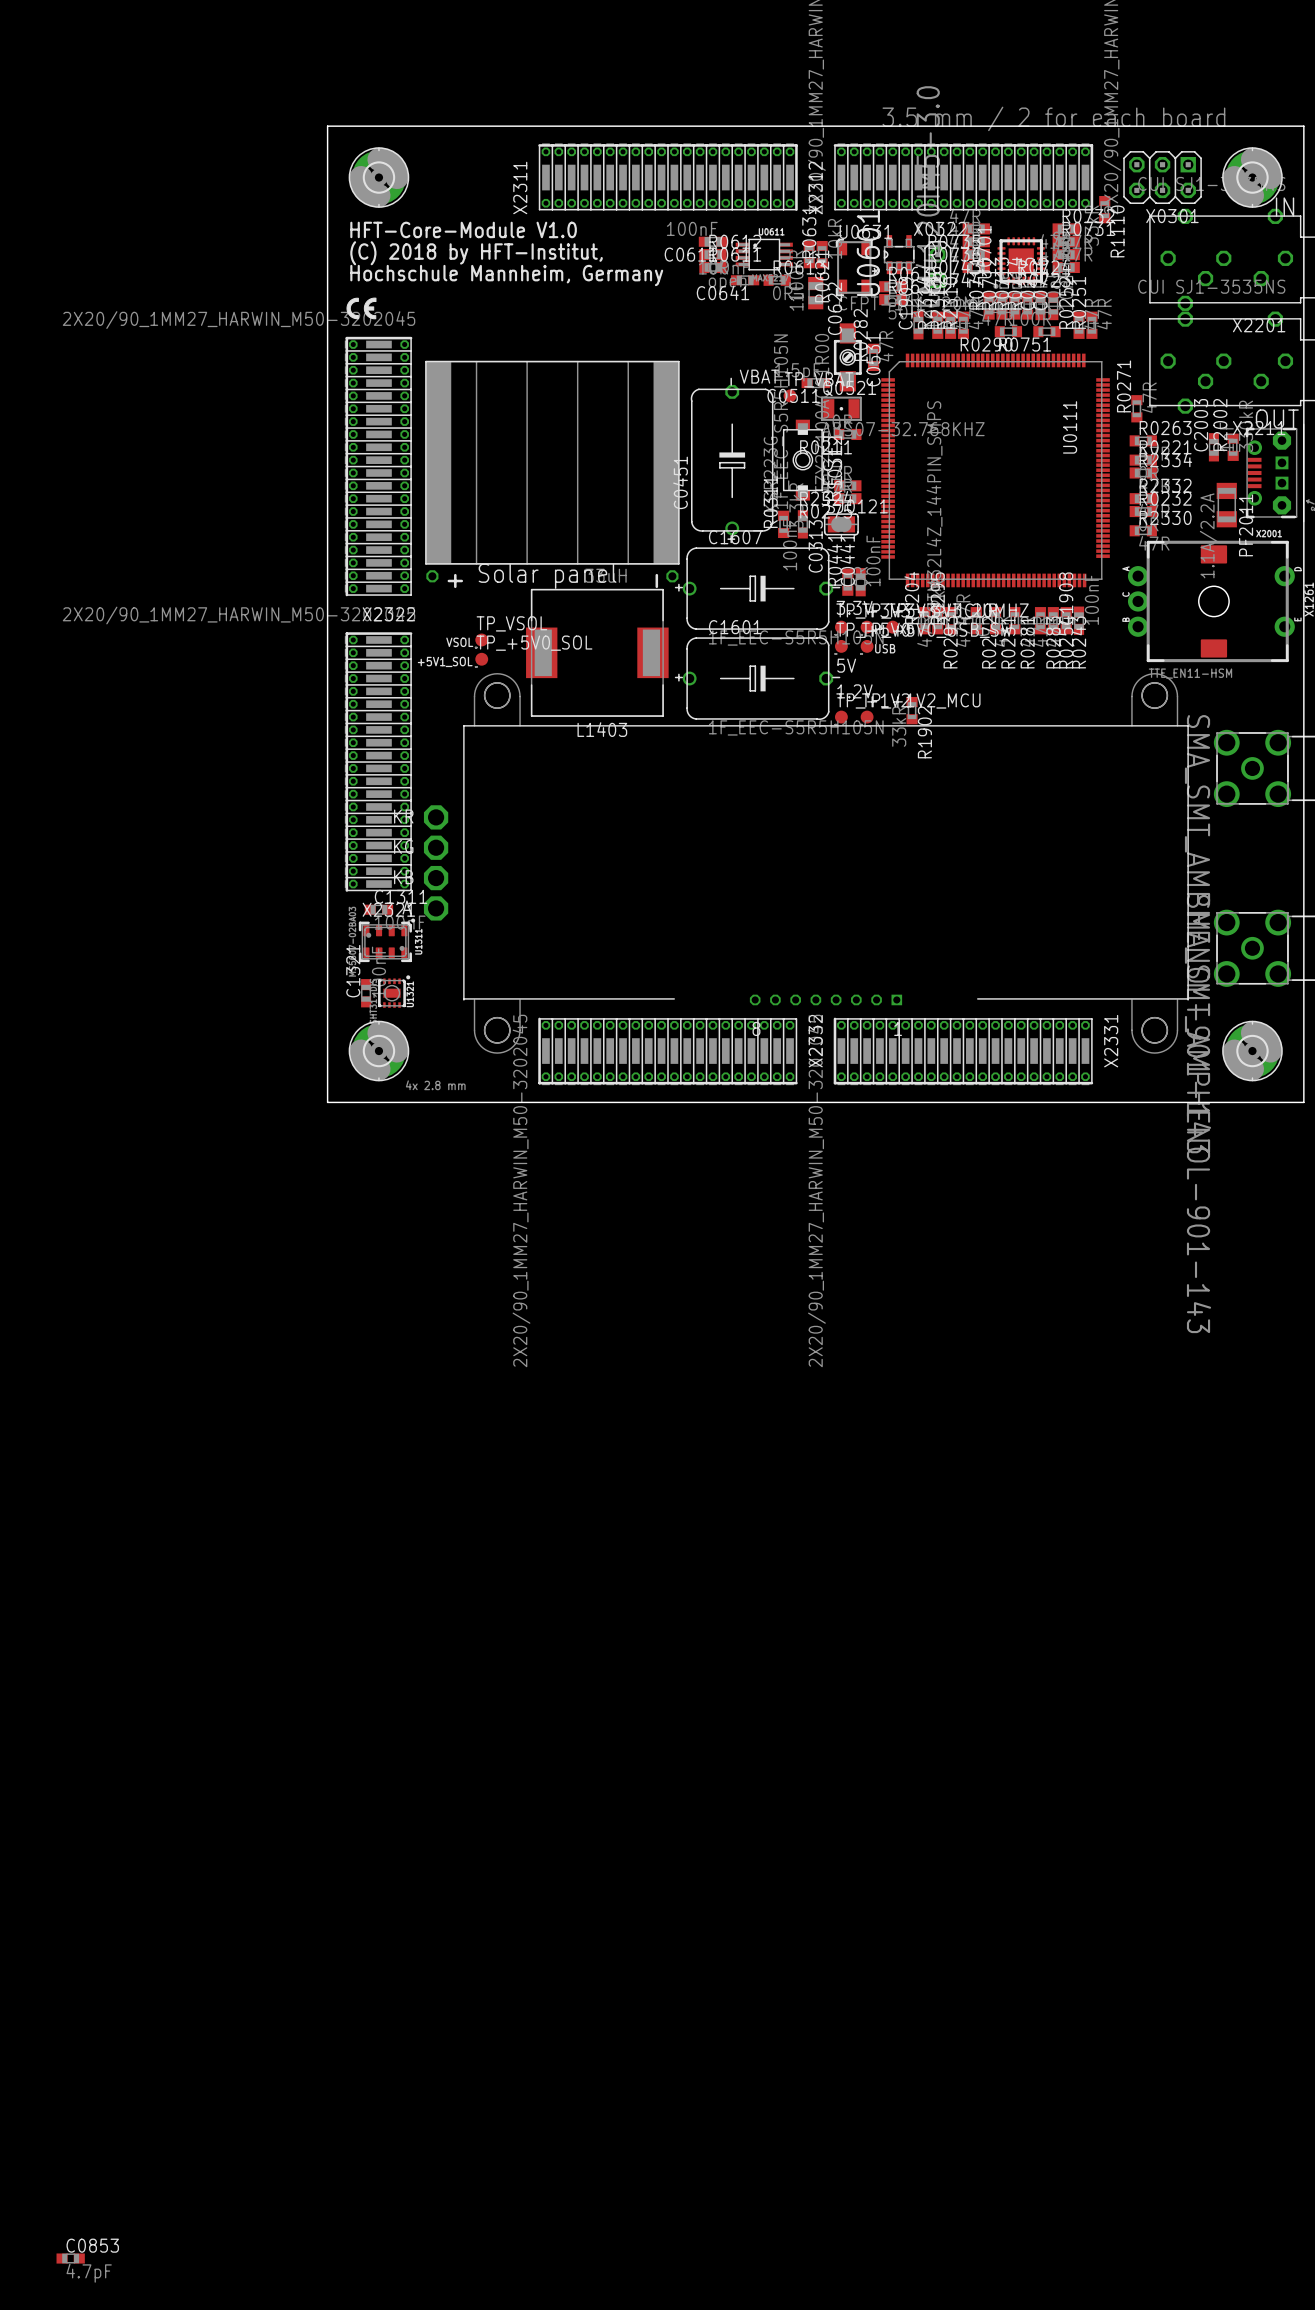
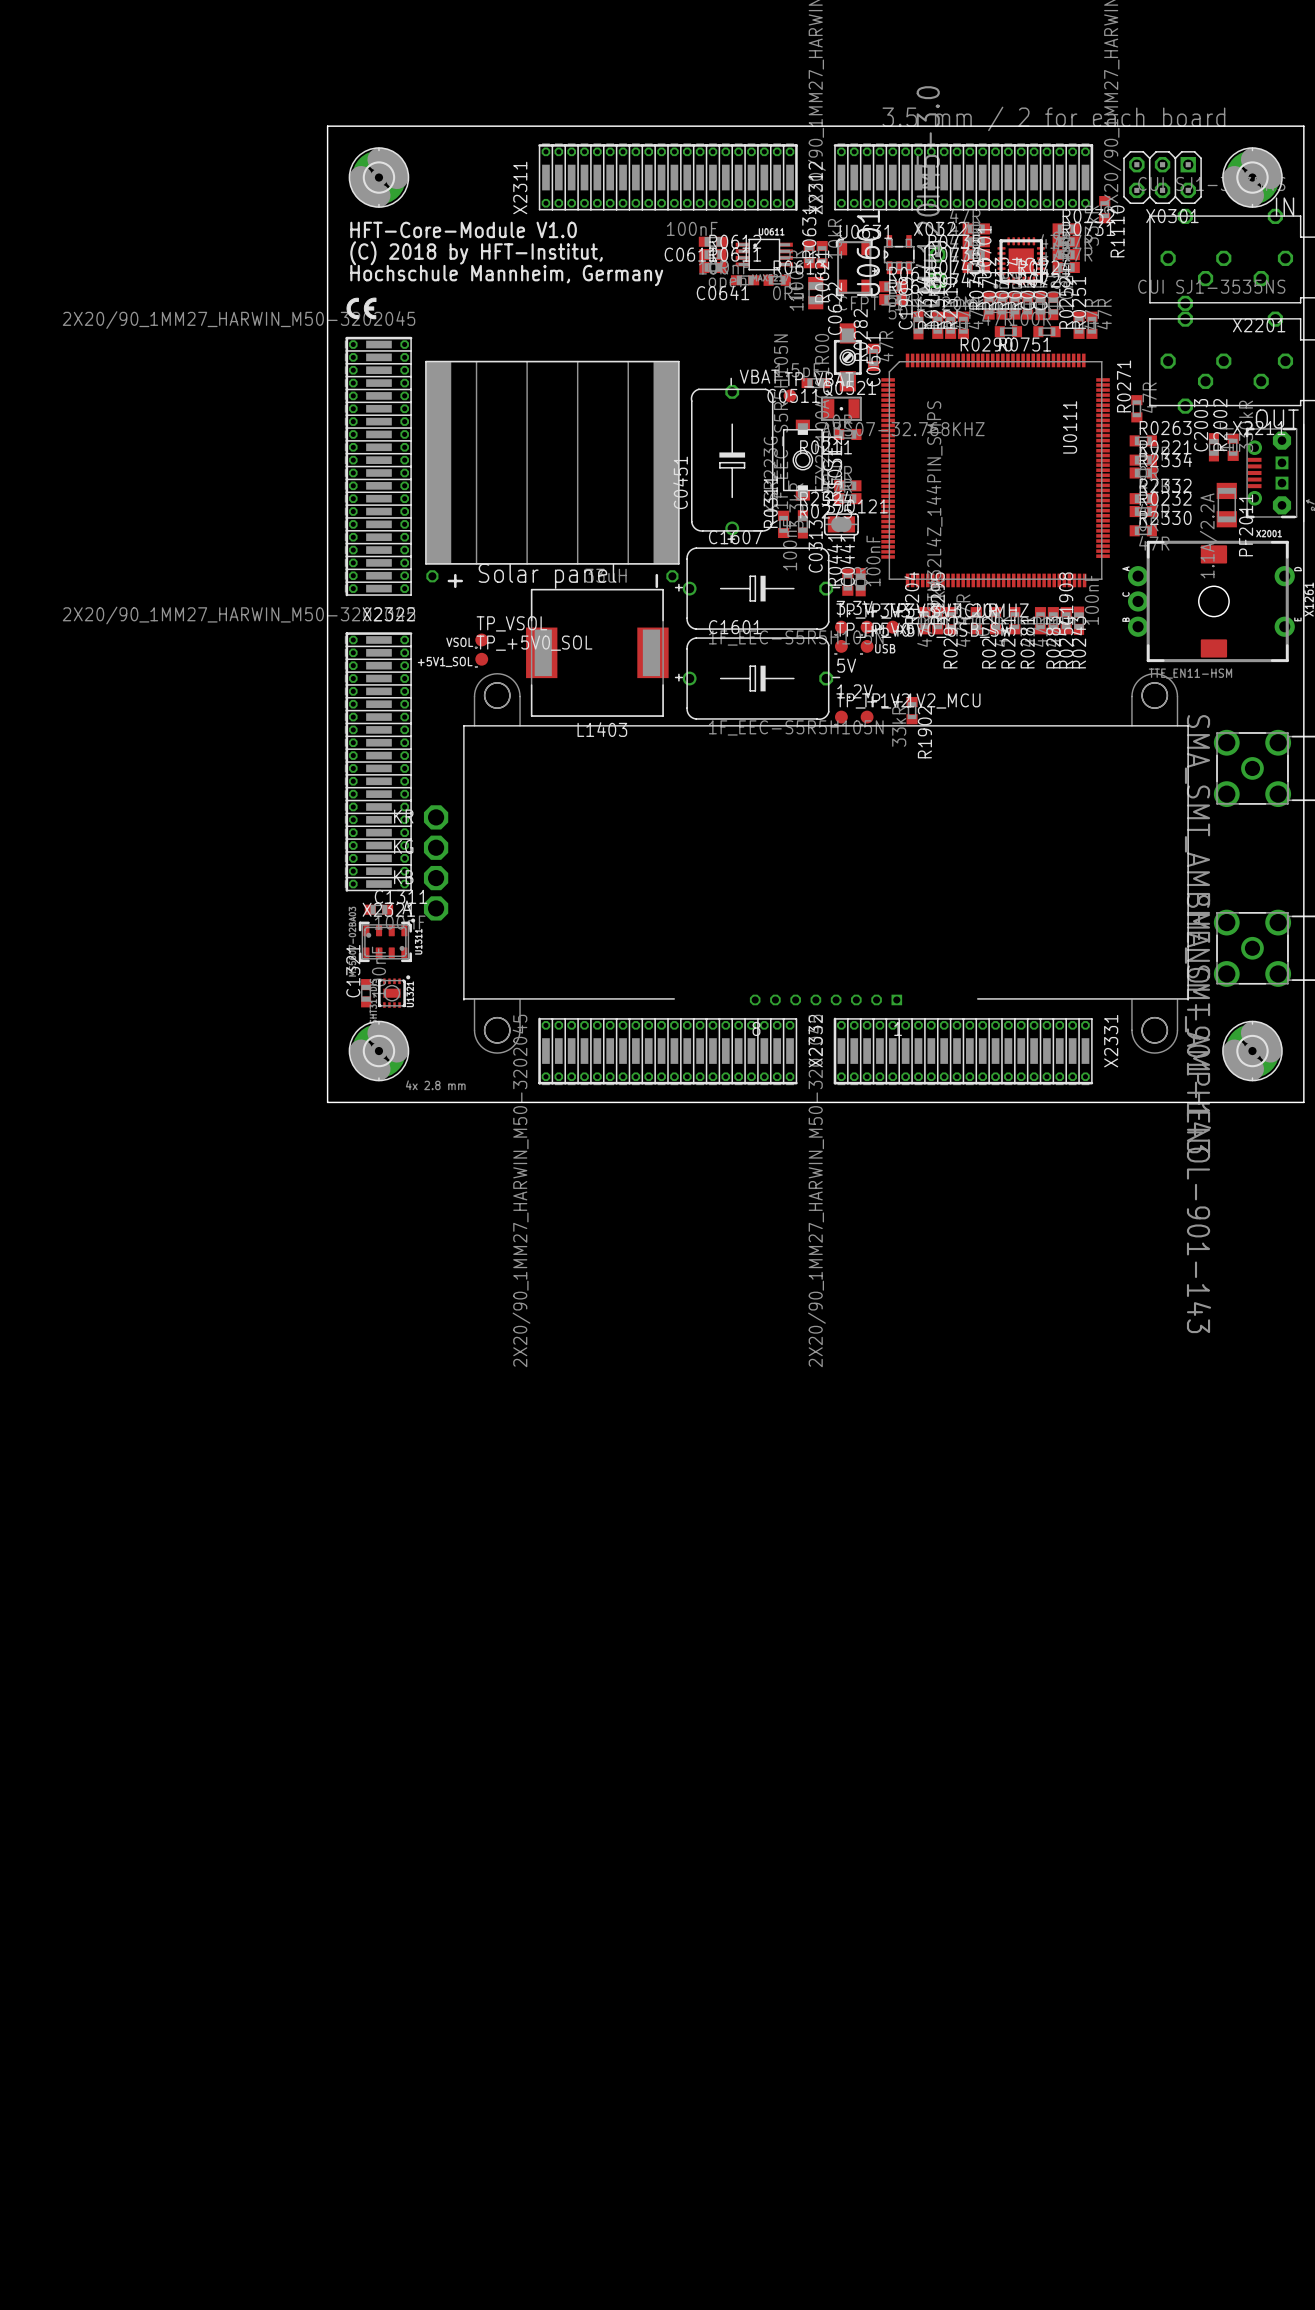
C0853: 4.7pF (70, 2258) -> none

